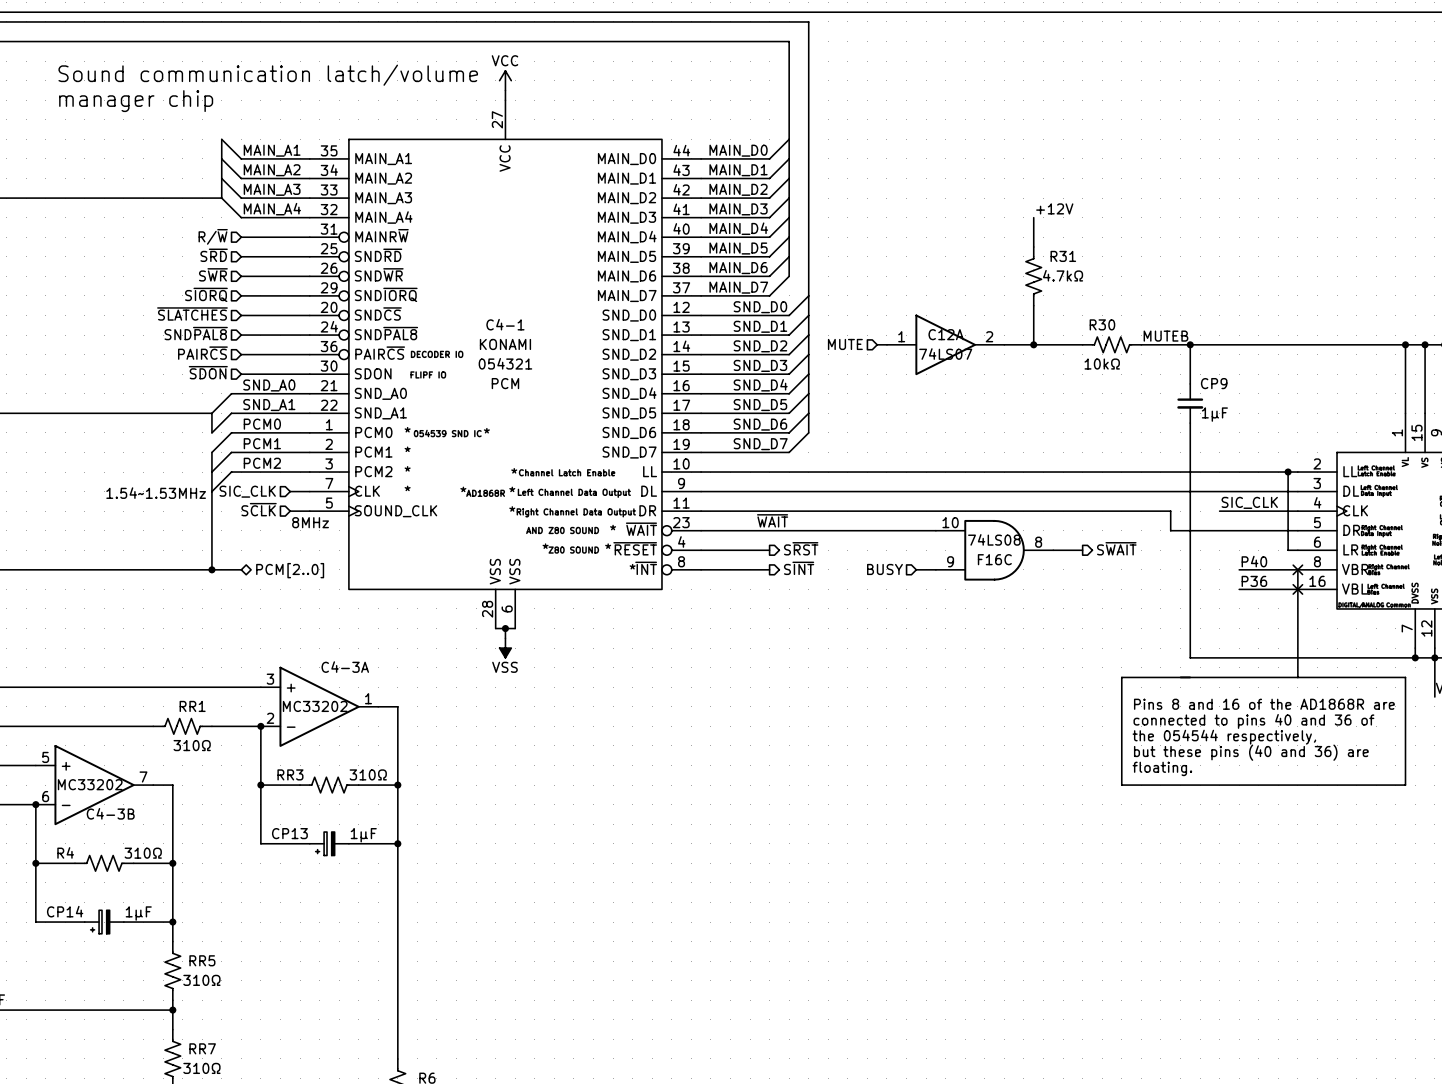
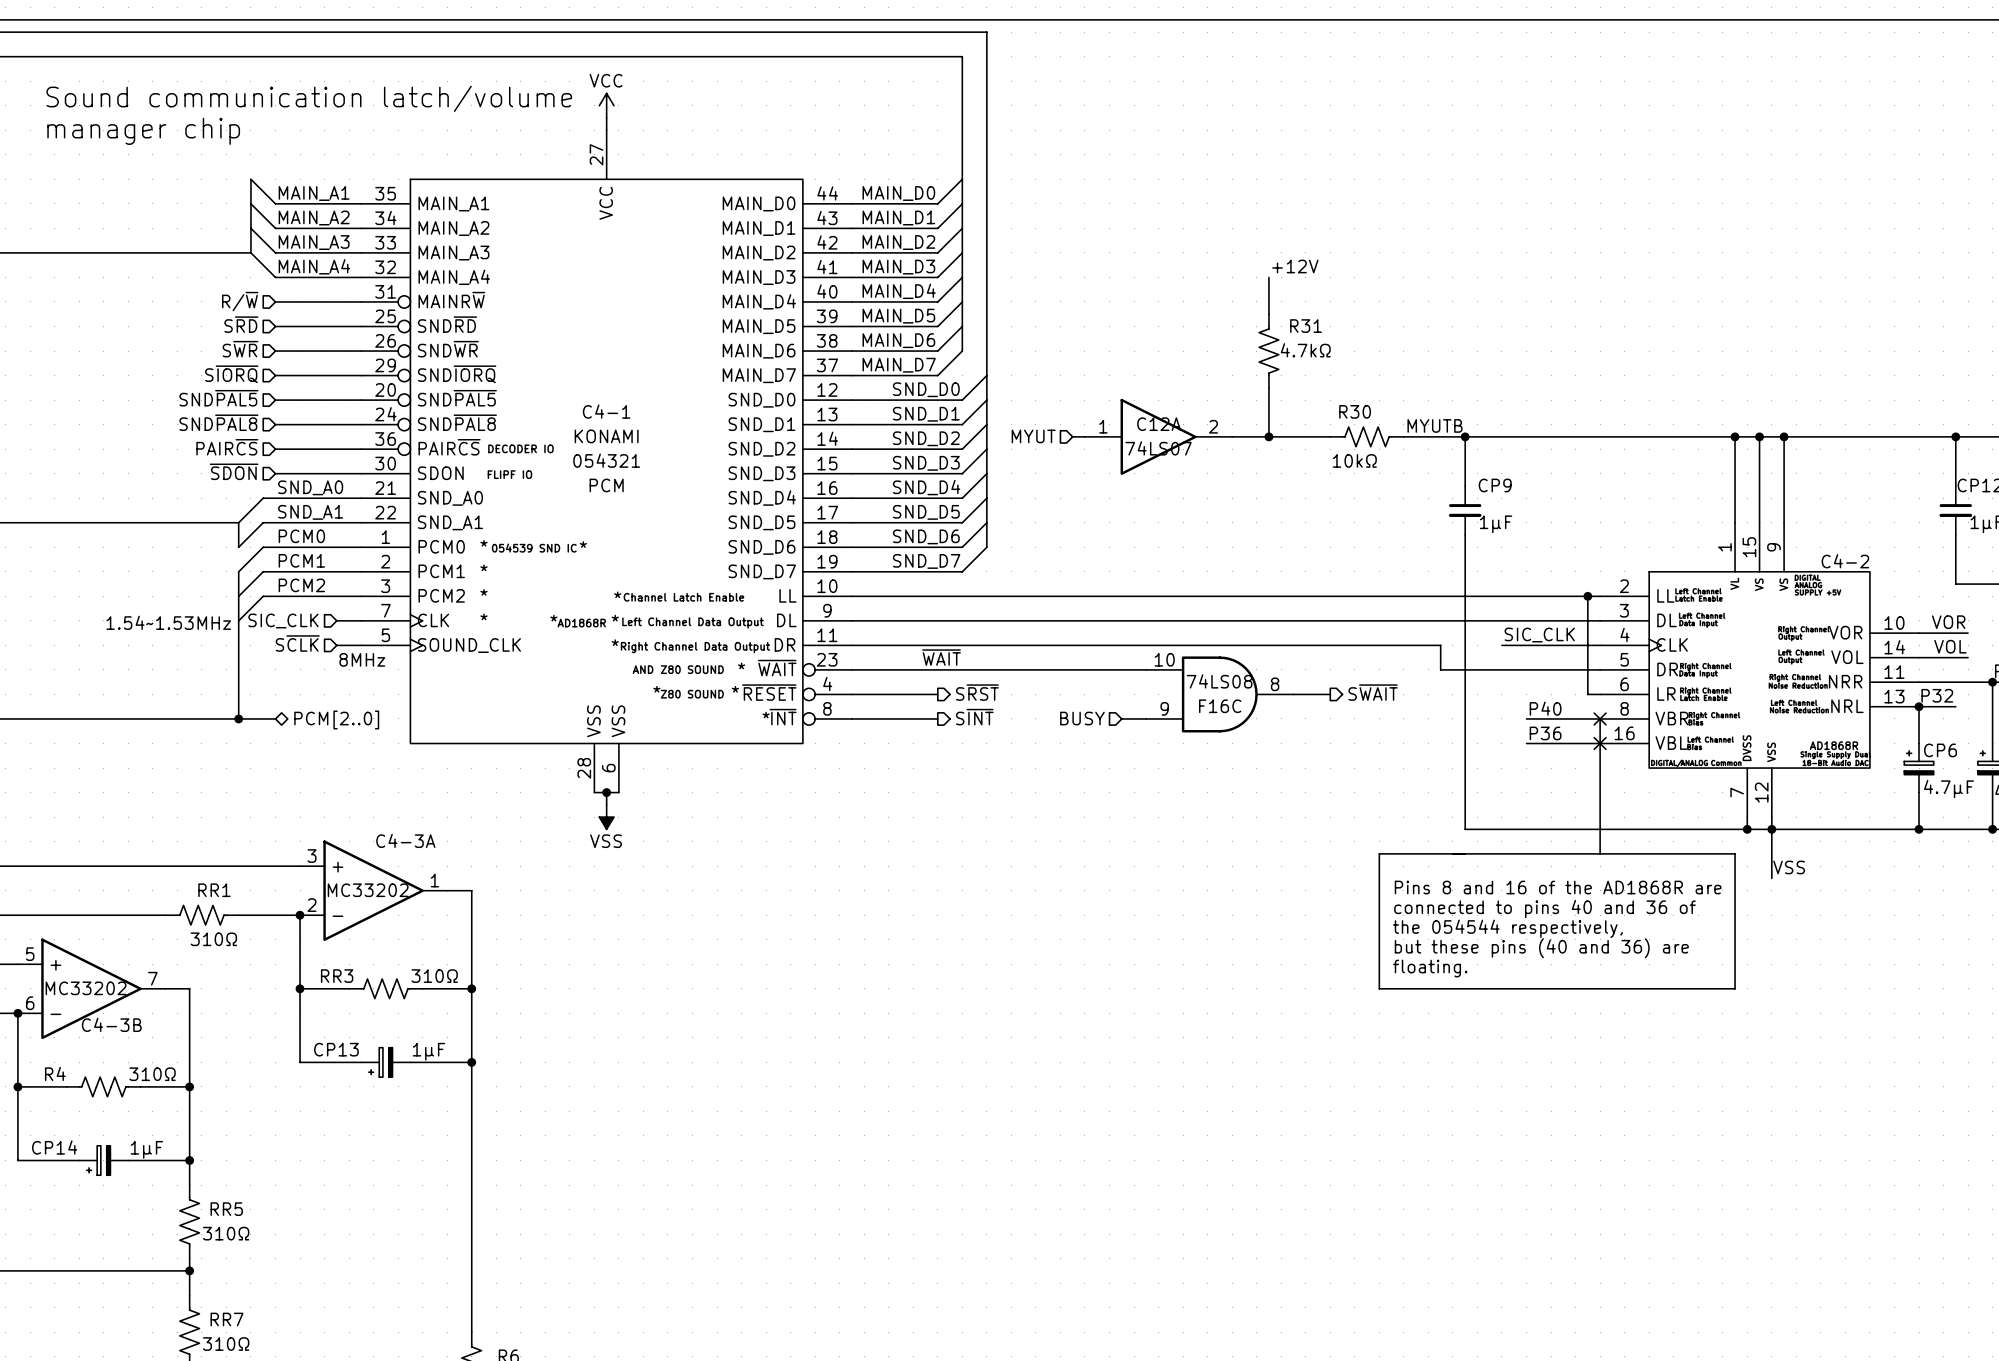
hierarchical label: ~{SLATCHES} (192, 313) -> SND~{PAL5} (218, 398)
C4-1 pin name: SND~{CS} (378, 313) -> SND~{PAL5} (457, 398)
label: MUTEB (1165, 336) -> MYUTB (1435, 425)
hierarchical label: MUTE (845, 344) -> MYUT (1033, 436)

